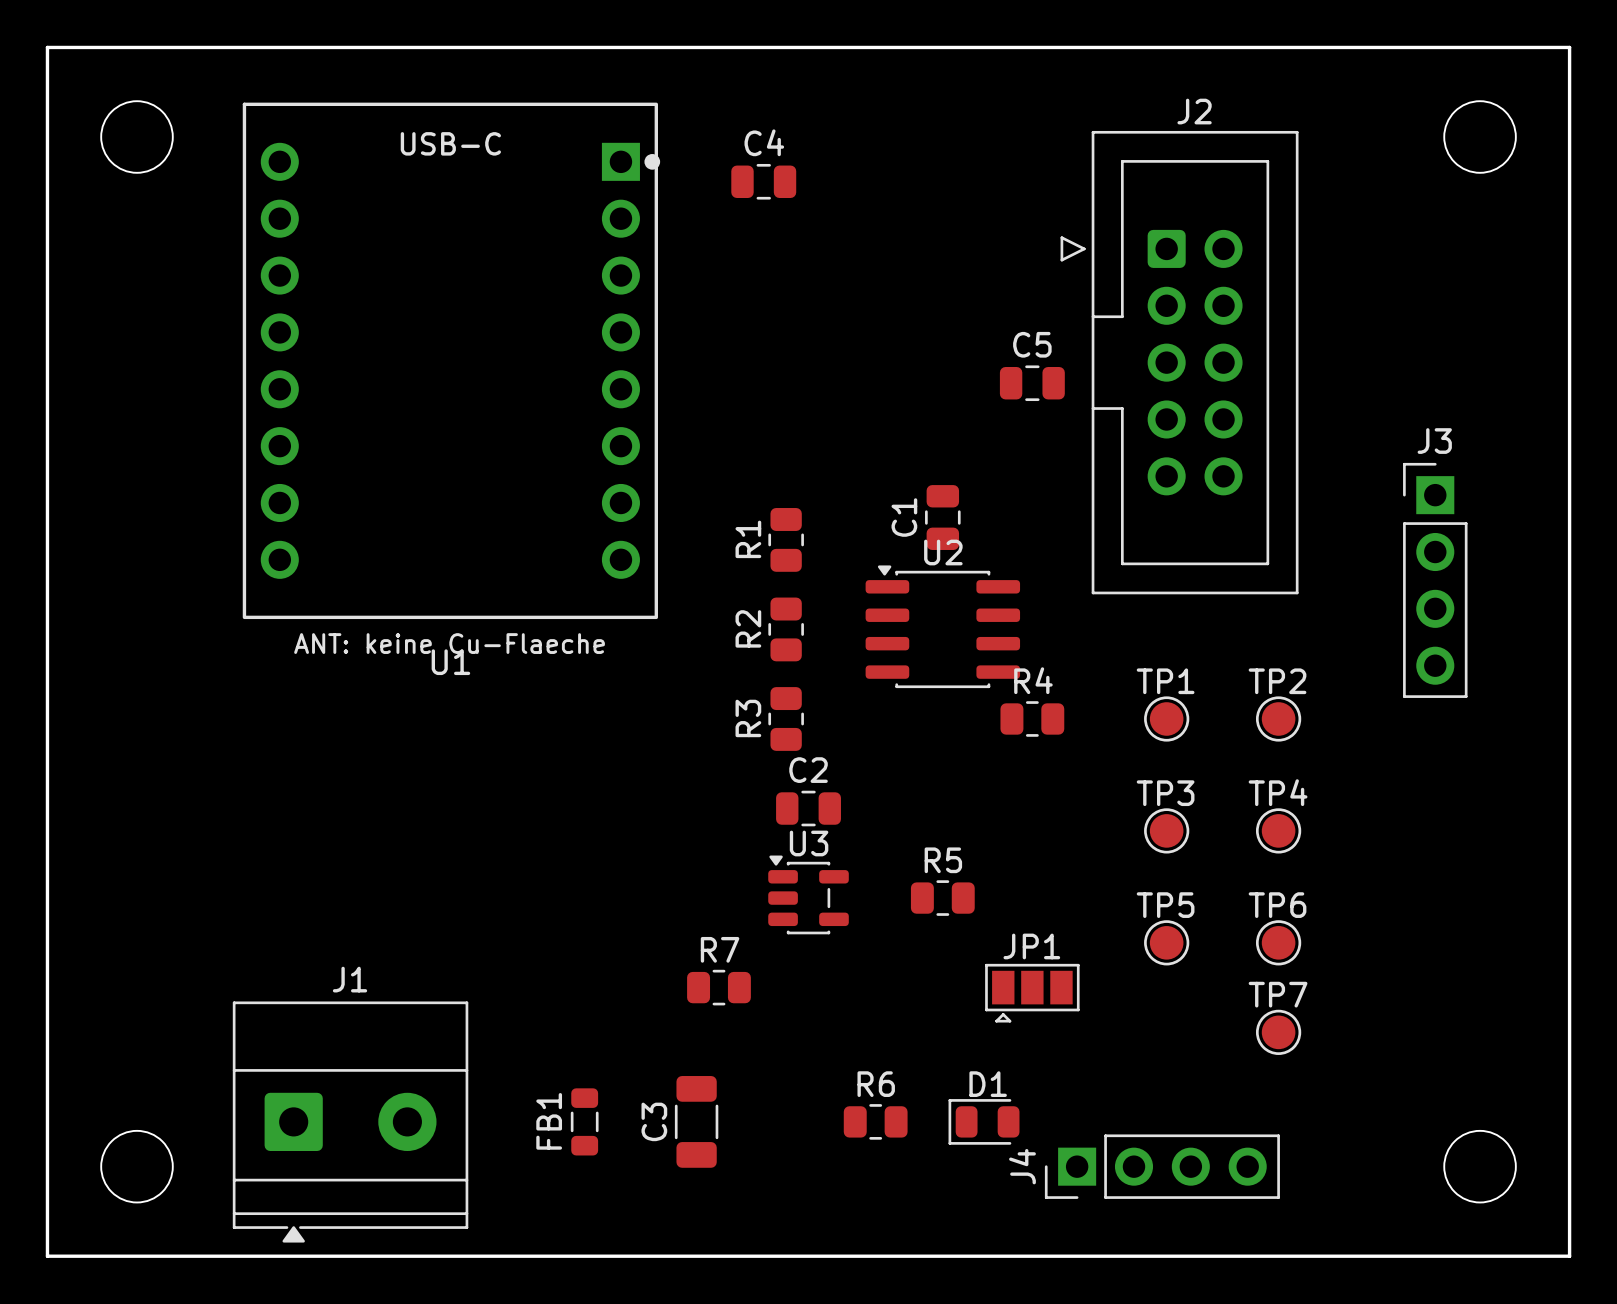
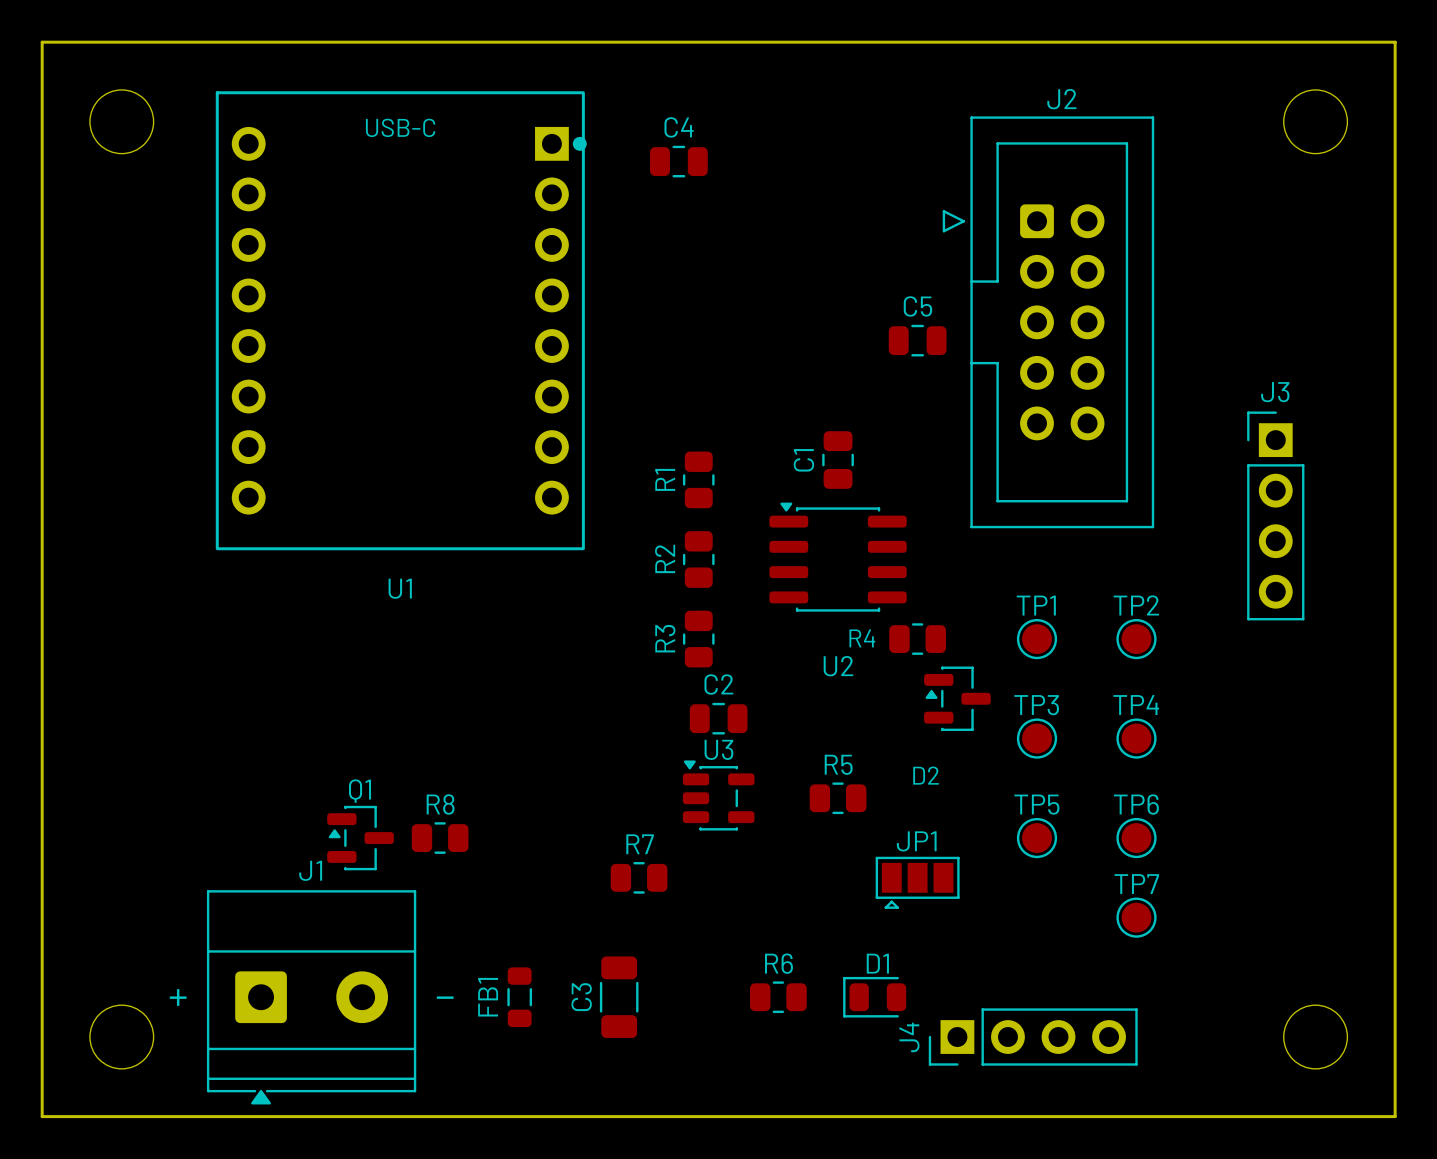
U2 name position: U2 (943, 552) -> U2 (838, 666)
U1 text: ANT: keine Cu-Flaeche (449, 643) -> none
R4 name position: R4 (1033, 680) -> R4 (862, 638)
D2: none -> (957, 698)
Q1: none -> (360, 838)
R8: none -> (440, 838)
text: none -> + (178, 997)
text: none -> − (445, 997)

